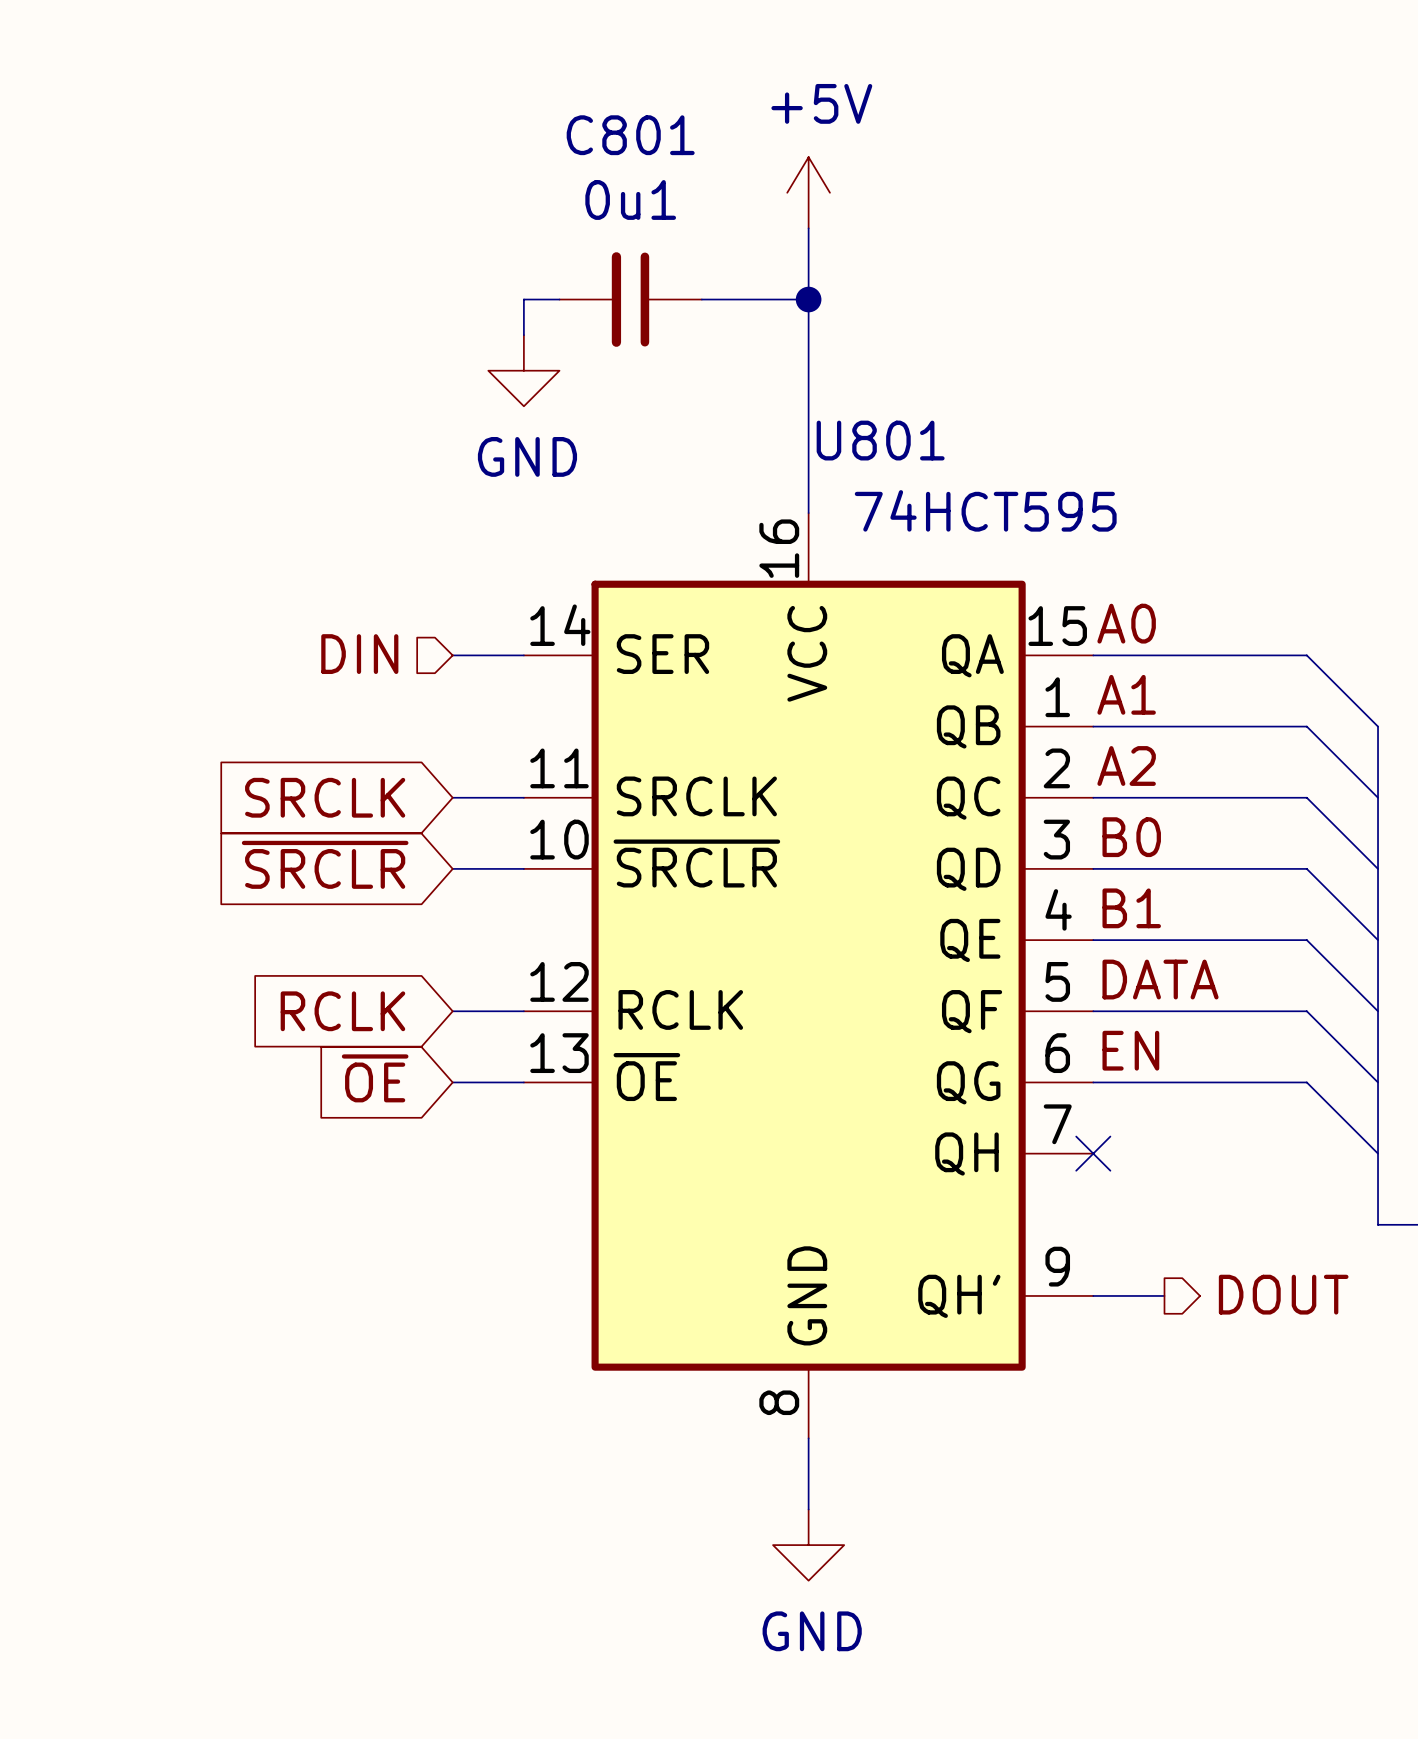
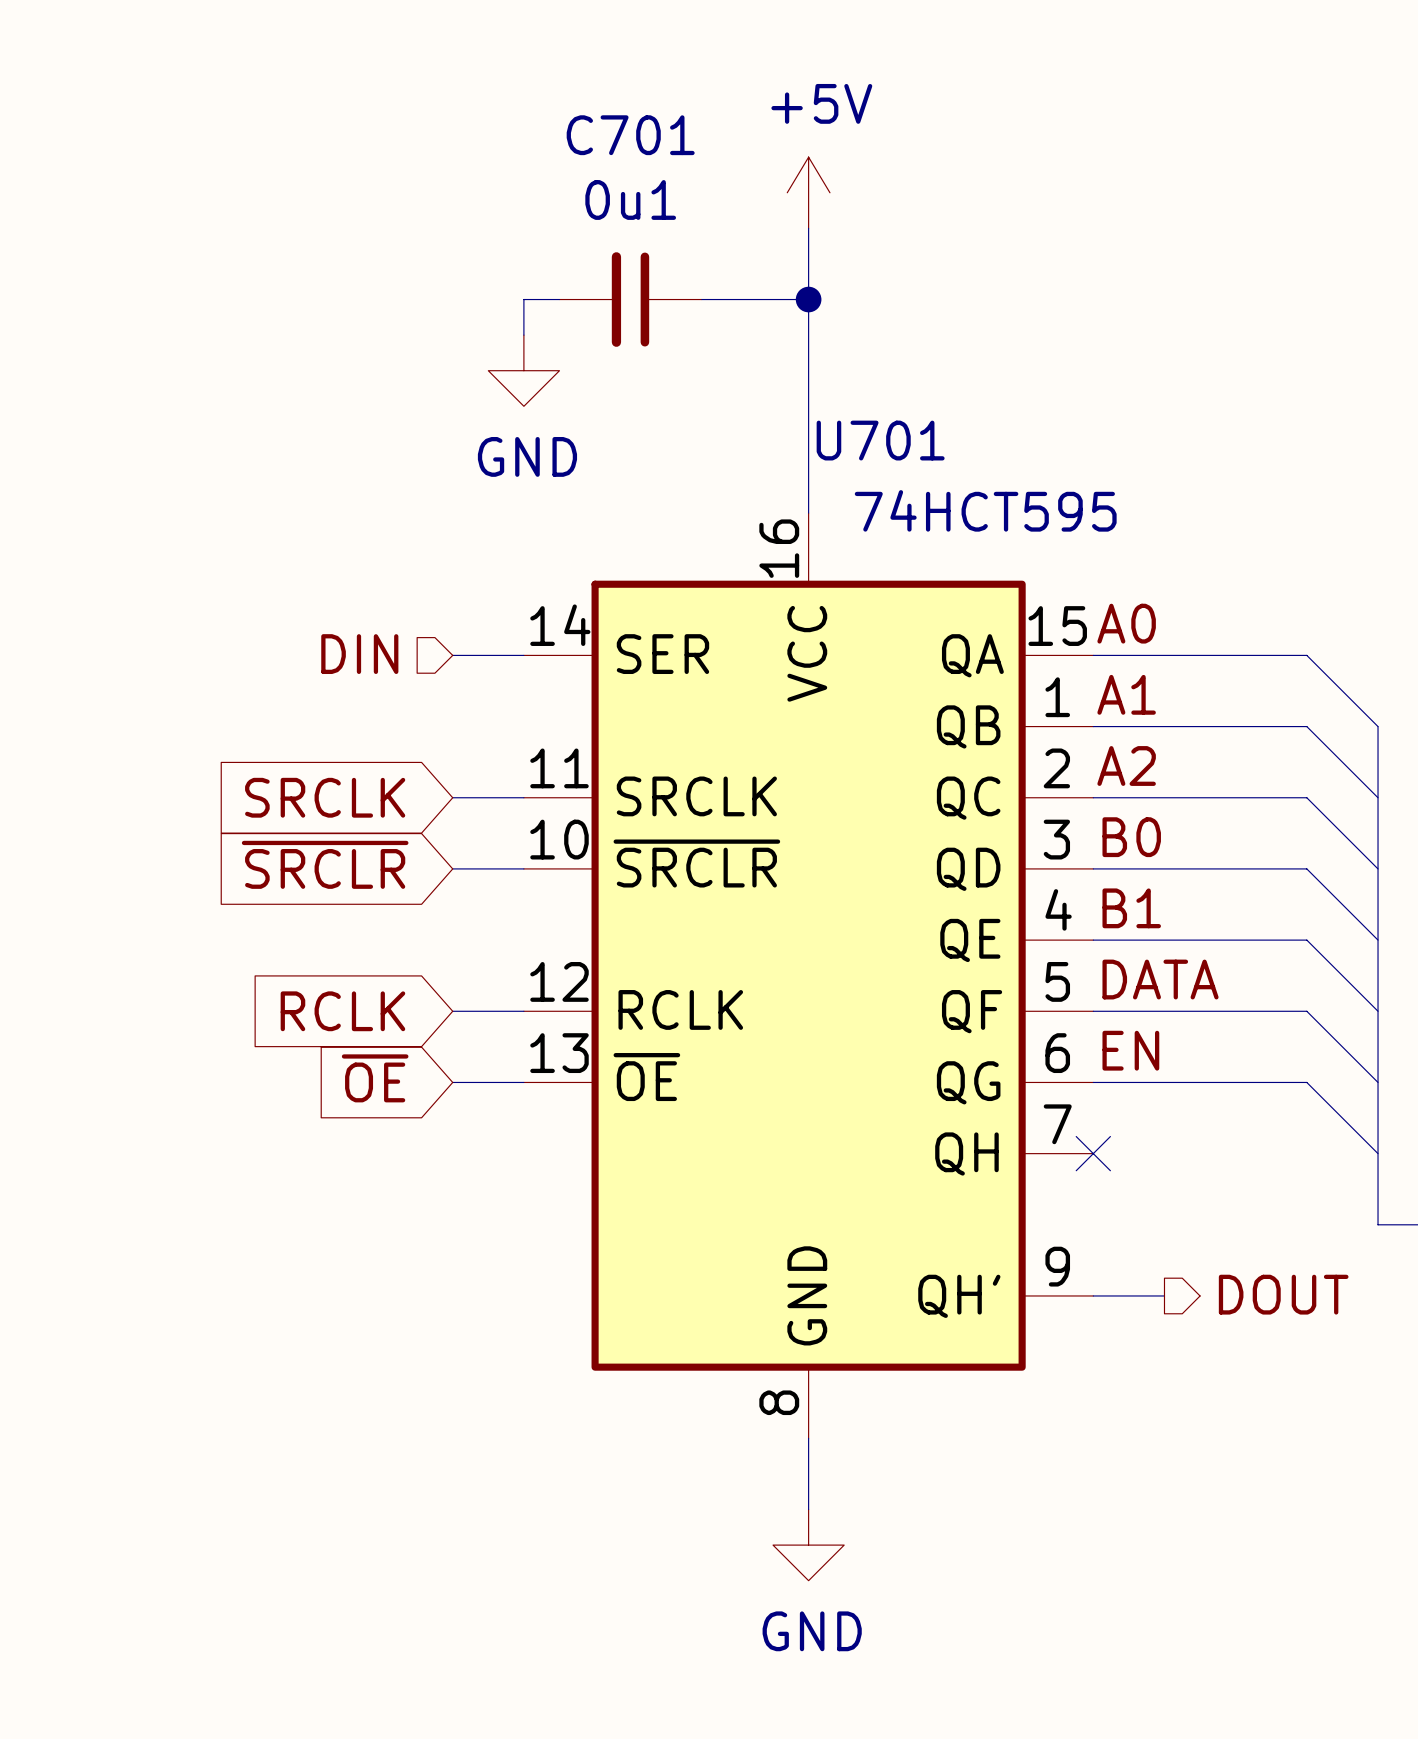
C801 name: C801 (630, 135) -> C701 (630, 135)
U801 name: U801 (880, 440) -> U701 (880, 440)

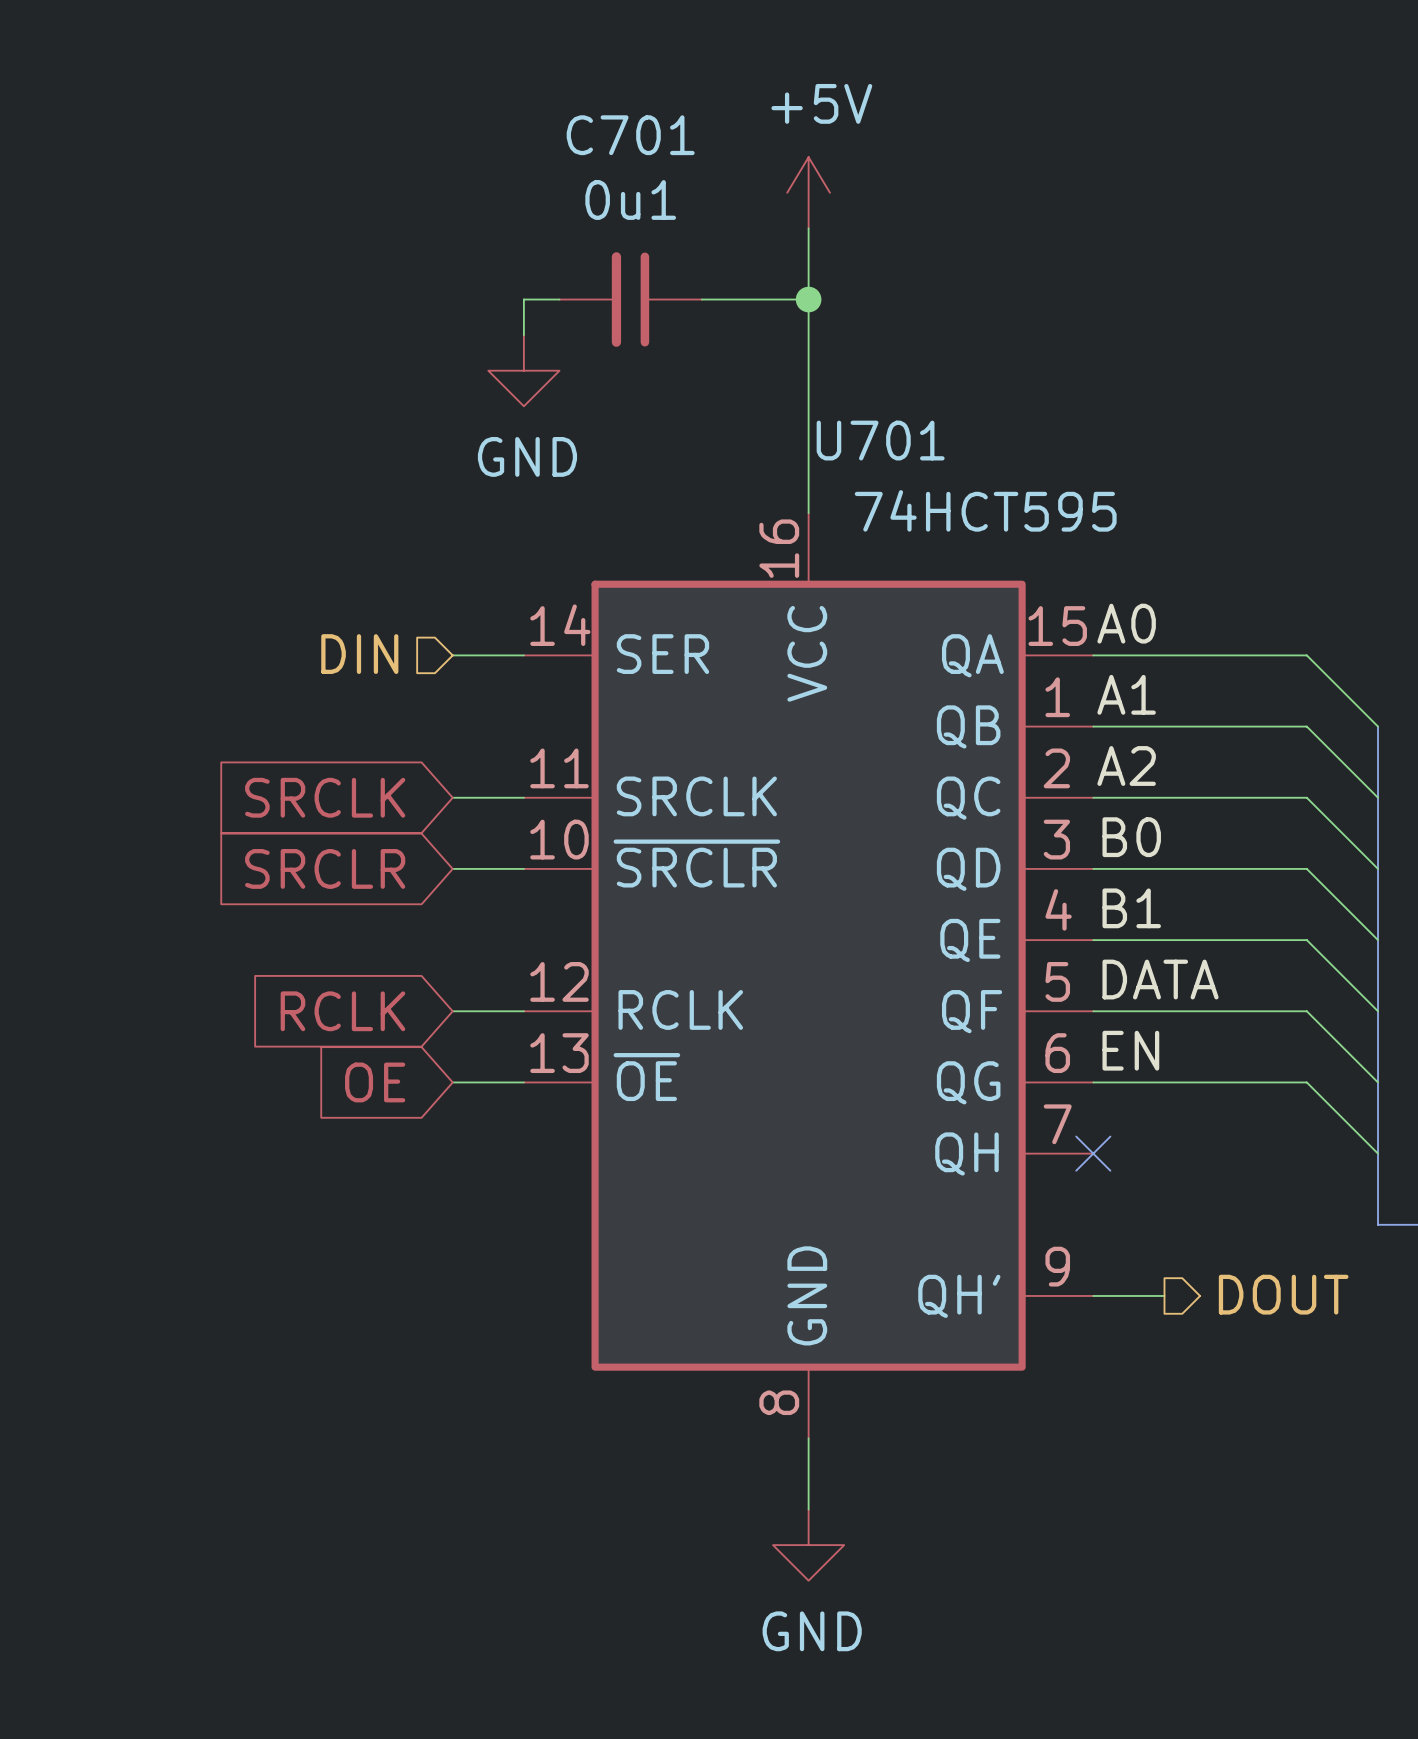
global label: ~{SRCLR} (325, 864) -> SRCLR (325, 868)
global label: ~{OE} (375, 1078) -> OE (375, 1082)

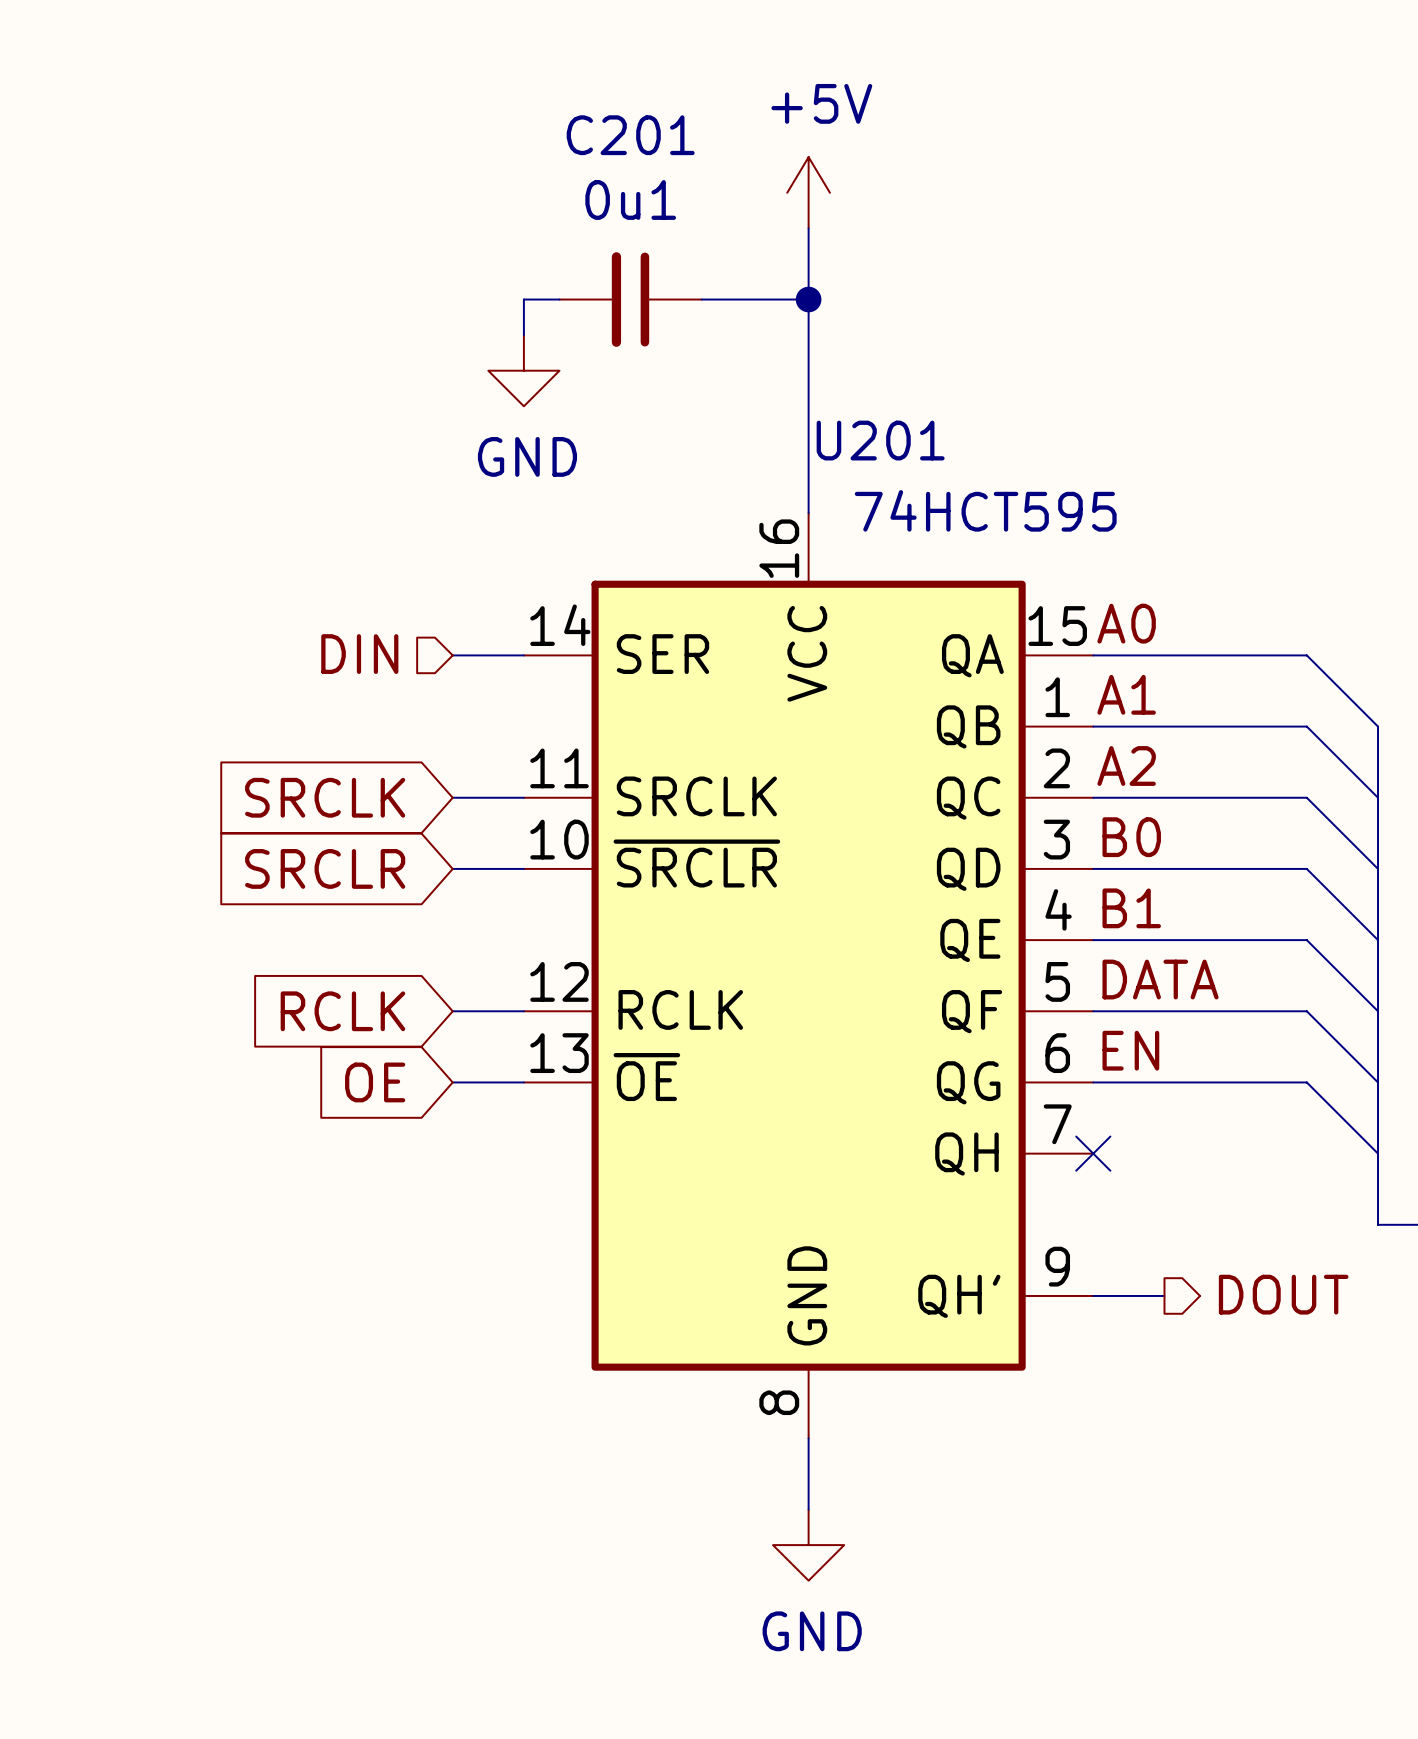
C701 name: C701 (630, 135) -> C201 (630, 135)
U701 name: U701 (880, 440) -> U201 (880, 440)

